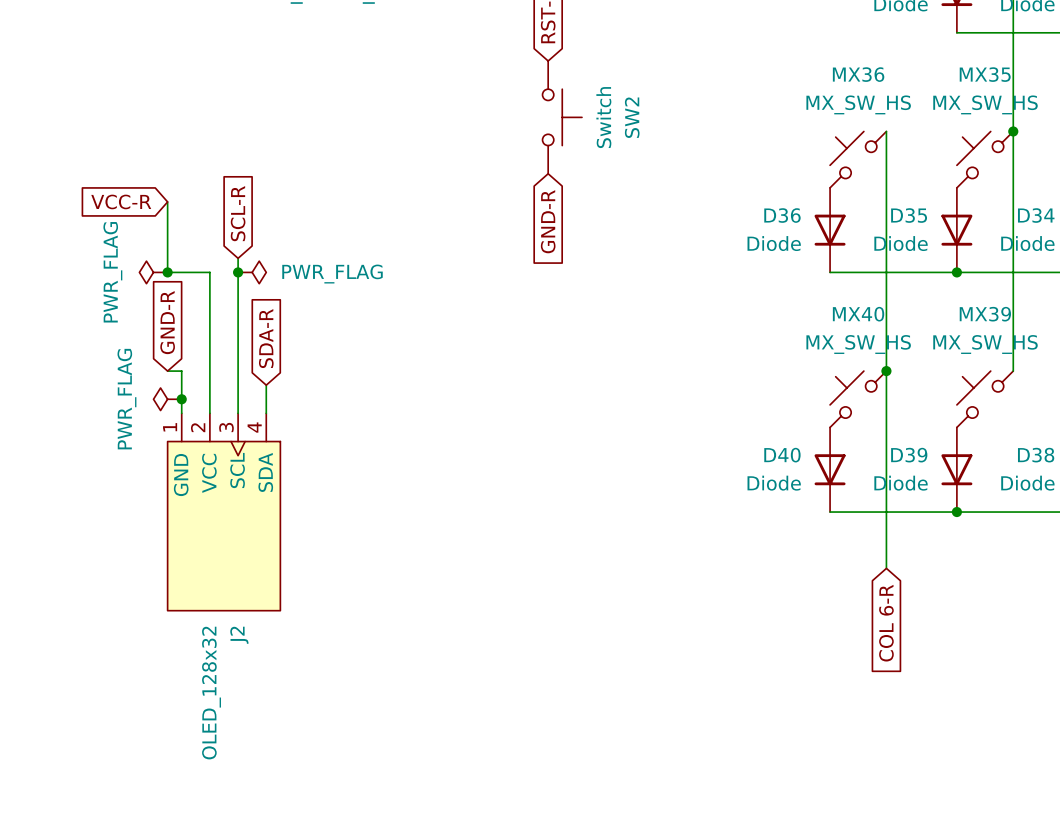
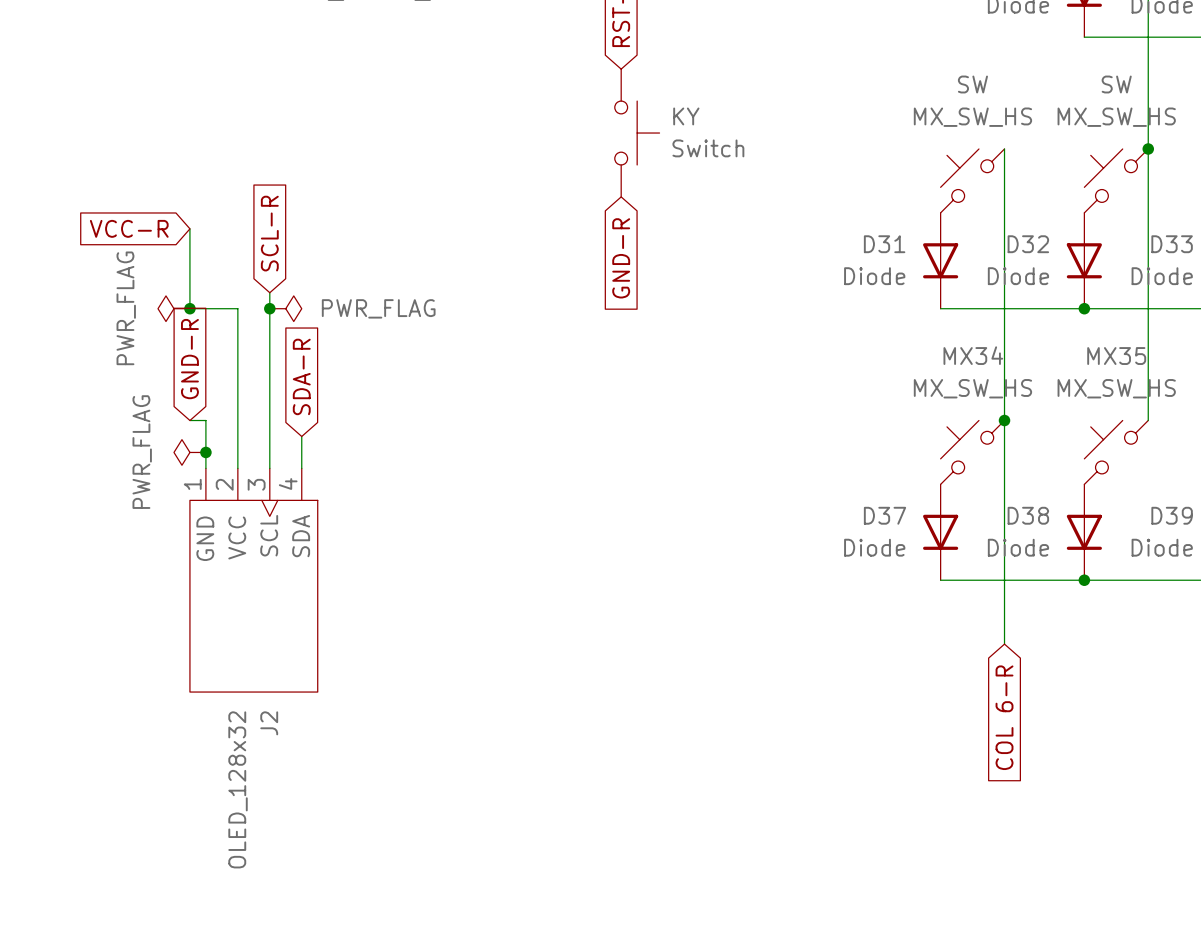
MX36 name: MX36 (858, 74) -> SW (972, 84)
MX35 name: MX35 (985, 74) -> SW (1116, 84)
SW2 value rotation: 0° (603, 117) -> 90° clockwise (708, 148)
SW2 name: SW2 (632, 117) -> KY (686, 116)
D36 name: D36 (782, 215) -> D31 (884, 244)
D35 name: D35 (909, 215) -> D32 (1028, 244)
D34 name: D34 (1036, 215) -> D33 (1172, 244)
MX40 name: MX40 (858, 314) -> MX34 (973, 355)
MX39 name: MX39 (985, 314) -> MX35 (1116, 356)
D40 name: D40 (782, 455) -> D37 (884, 515)
D39 name: D39 (909, 455) -> D38 (1028, 515)
D38 name: D38 (1036, 455) -> D39 (1172, 515)

